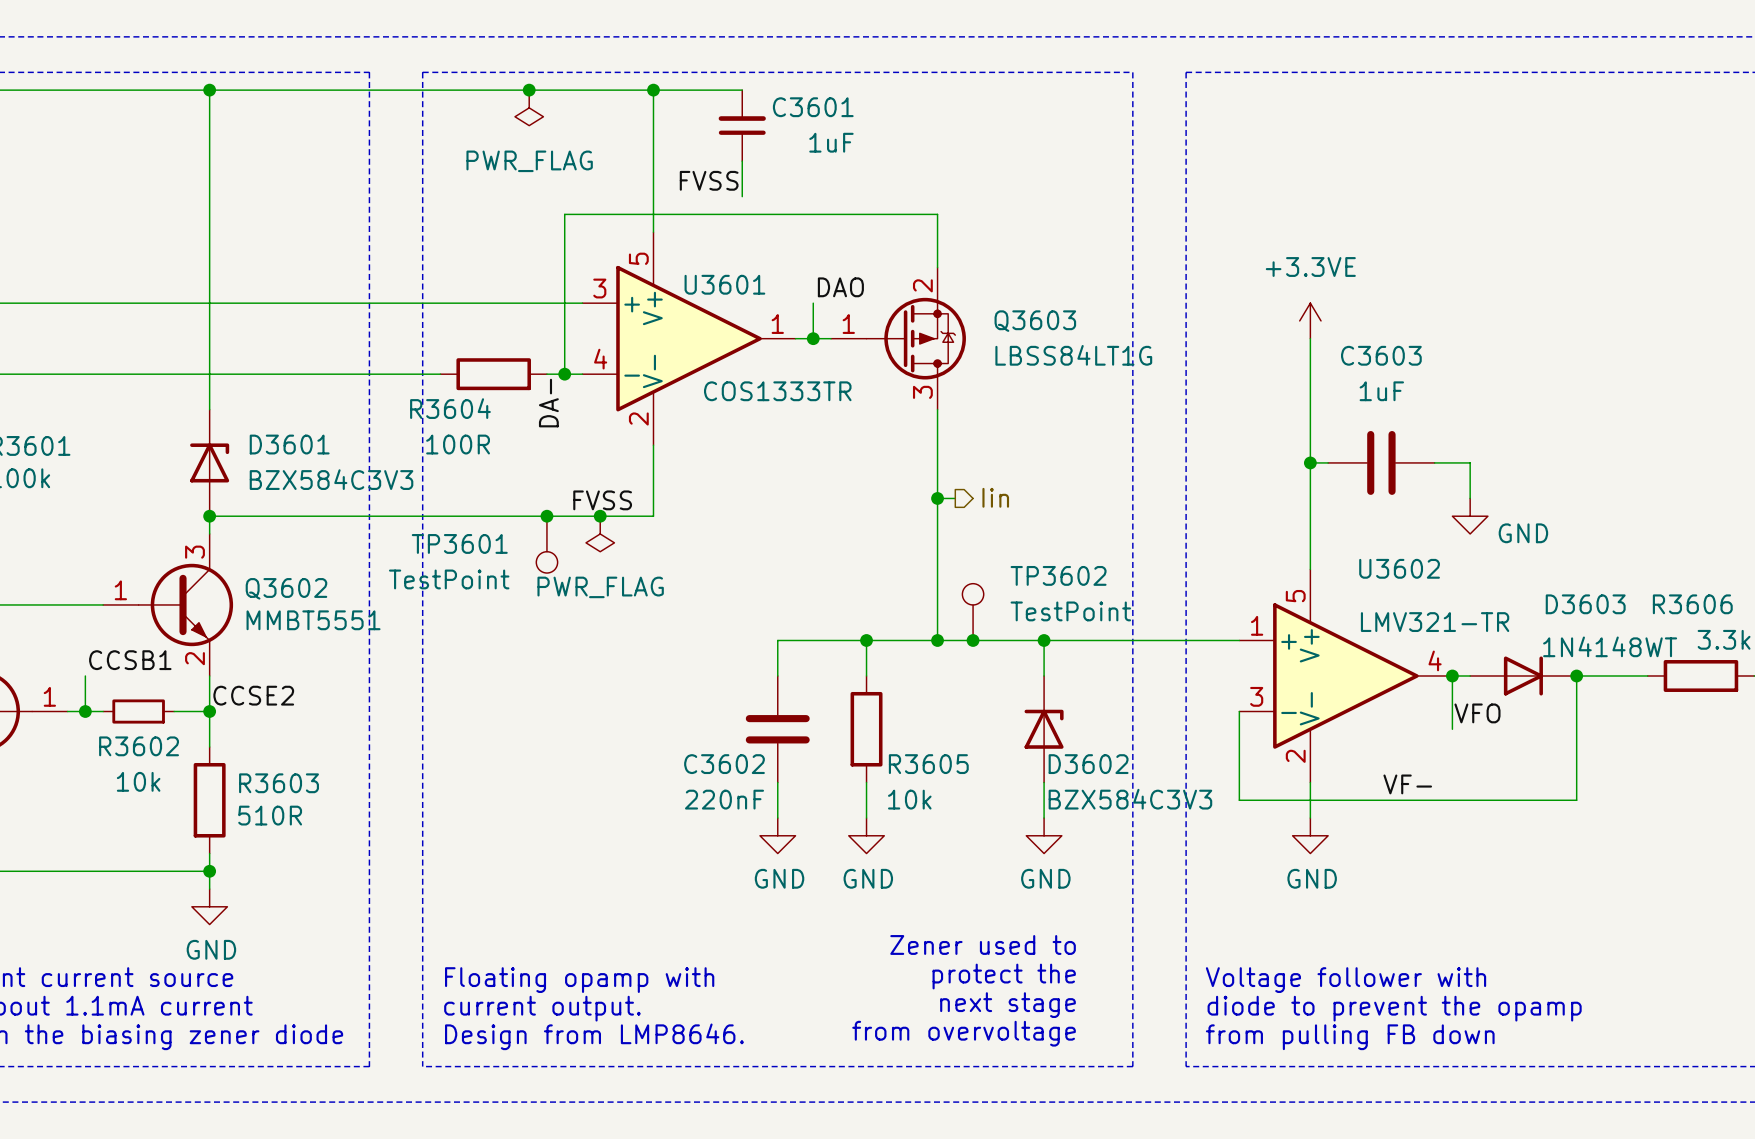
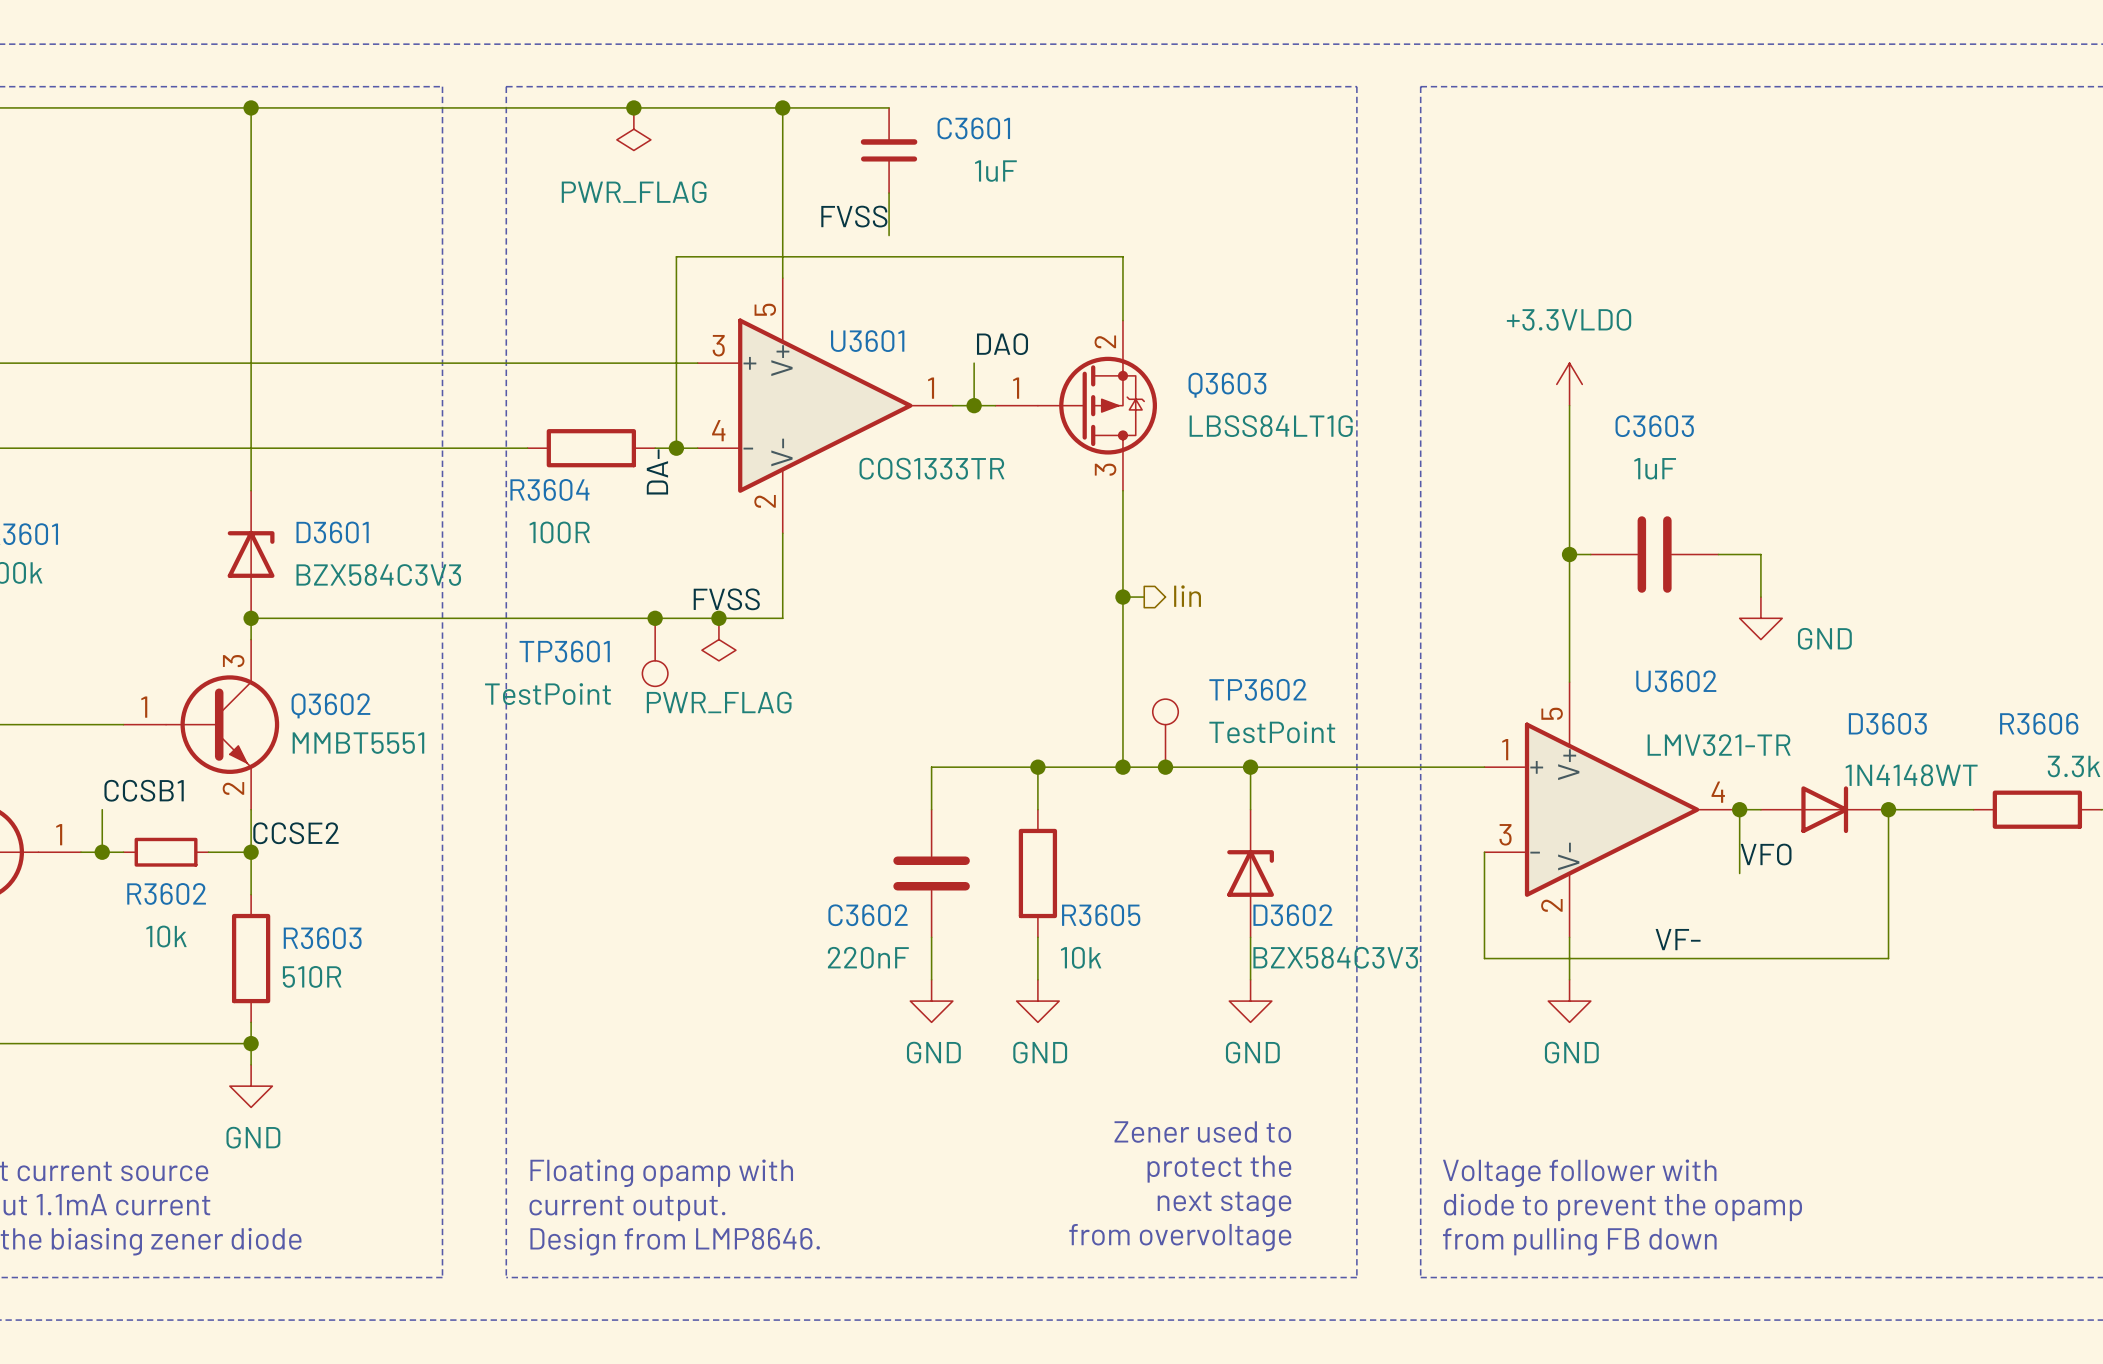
power symbol: +3.3VE (1310, 320) -> +3.3VLDO (1569, 384)

